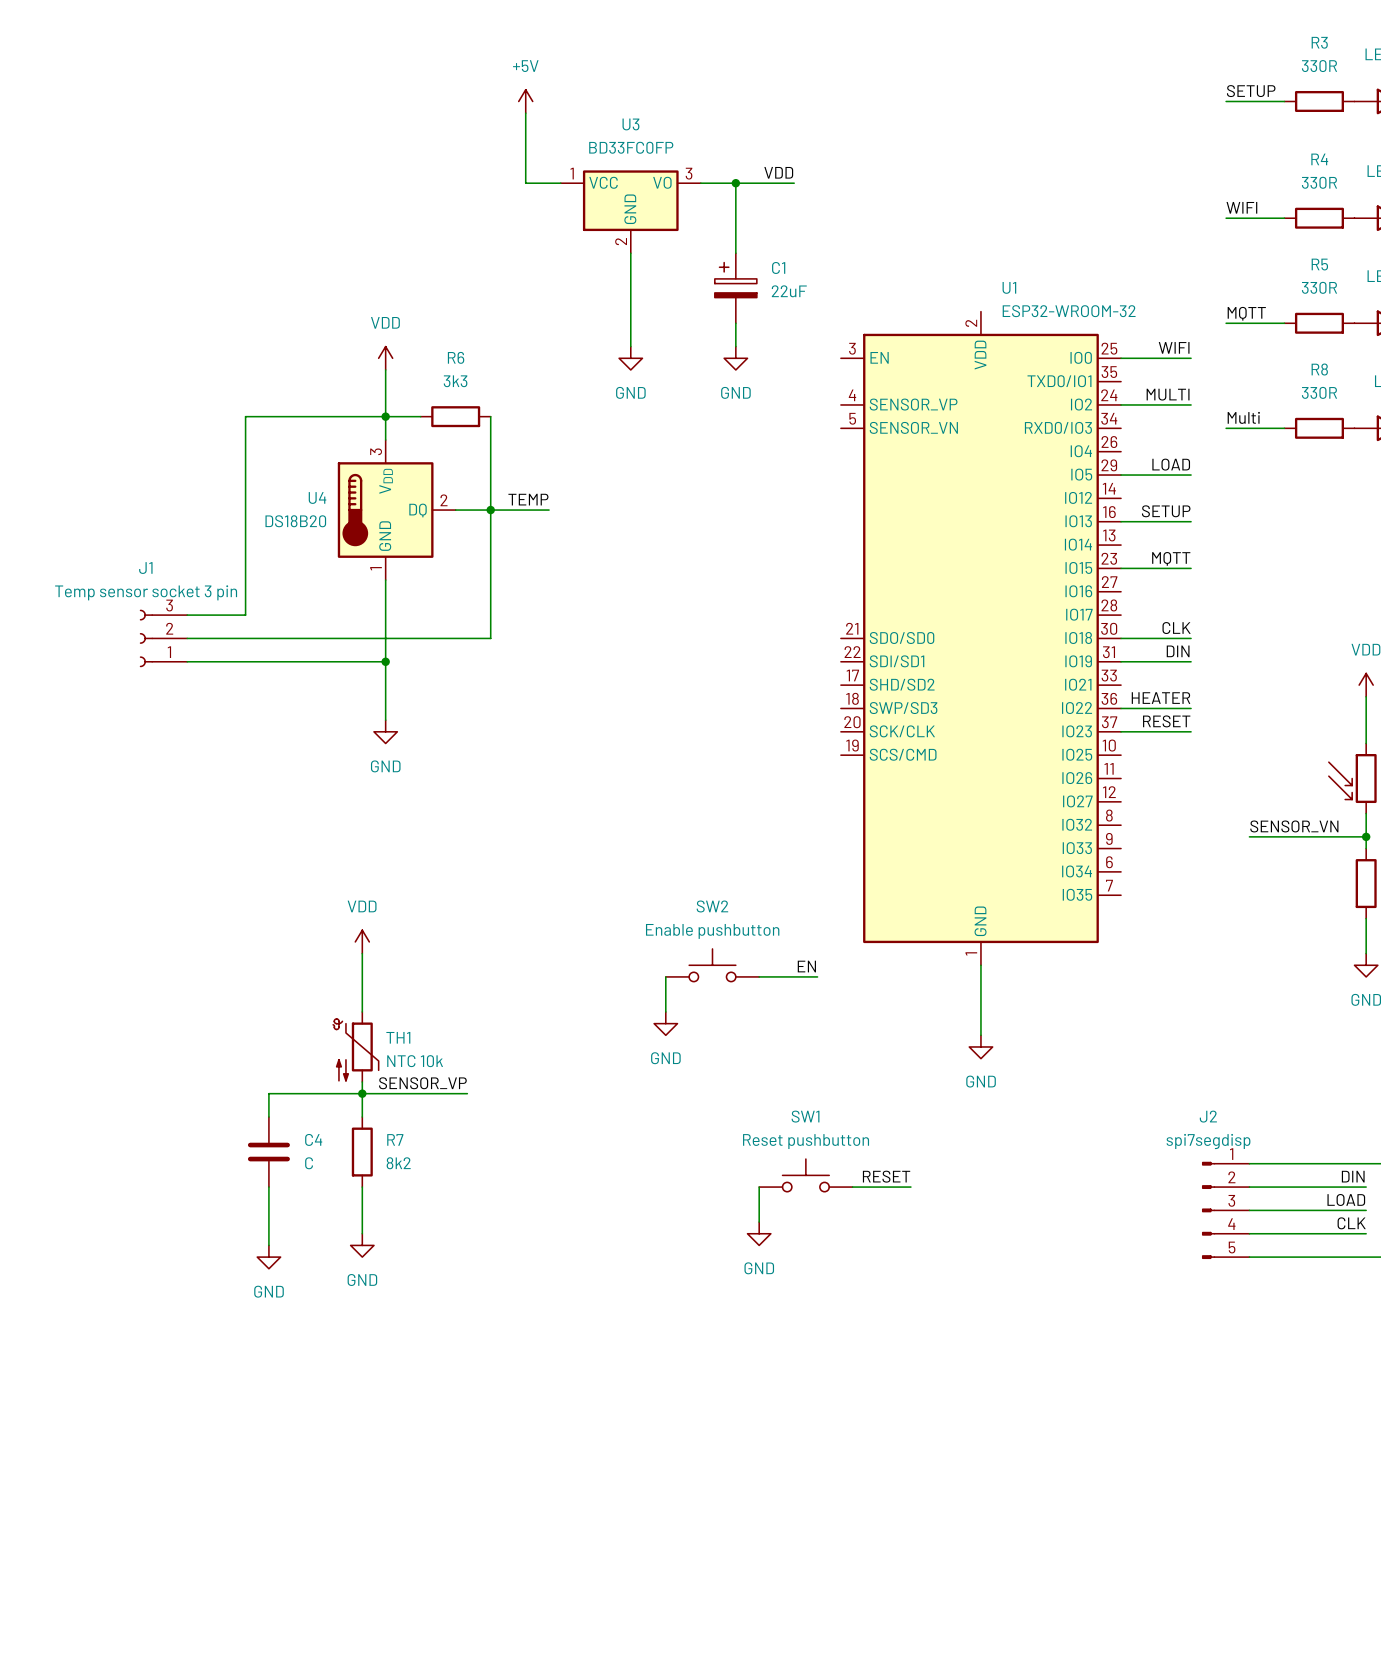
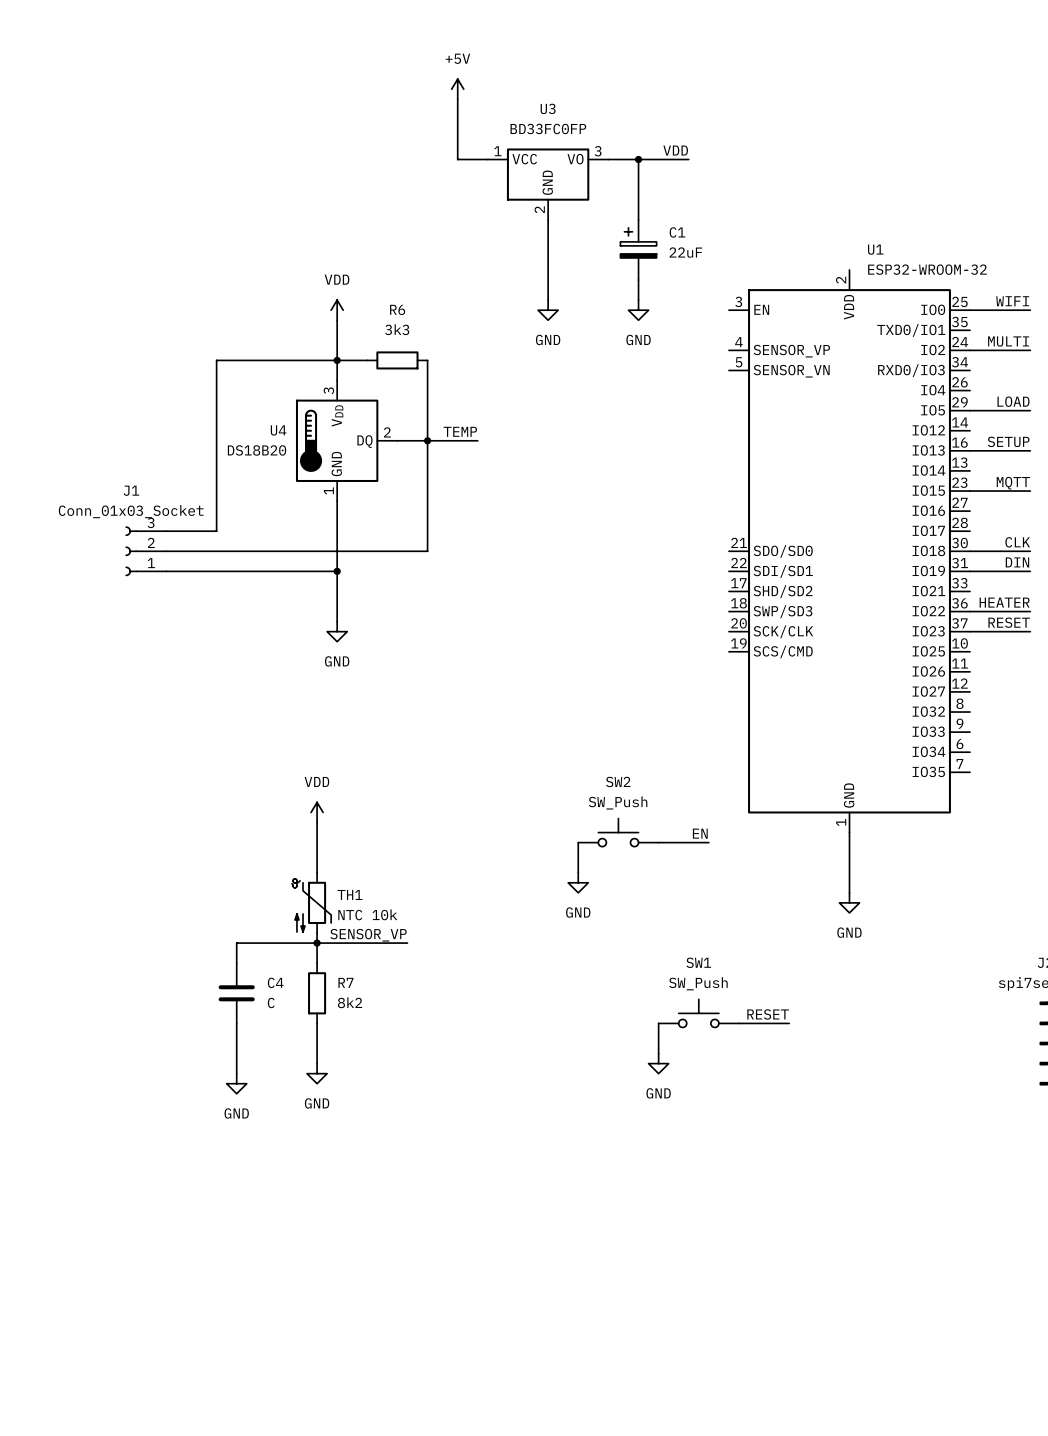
J1 value: Temp sensor socket 3 pin (146, 592) -> Conn_01x03_Socket (131, 511)
SW2 value: Enable pushbutton (712, 931) -> SW_Push (618, 802)
SW1 value: Reset pushbutton (806, 1141) -> SW_Push (698, 983)

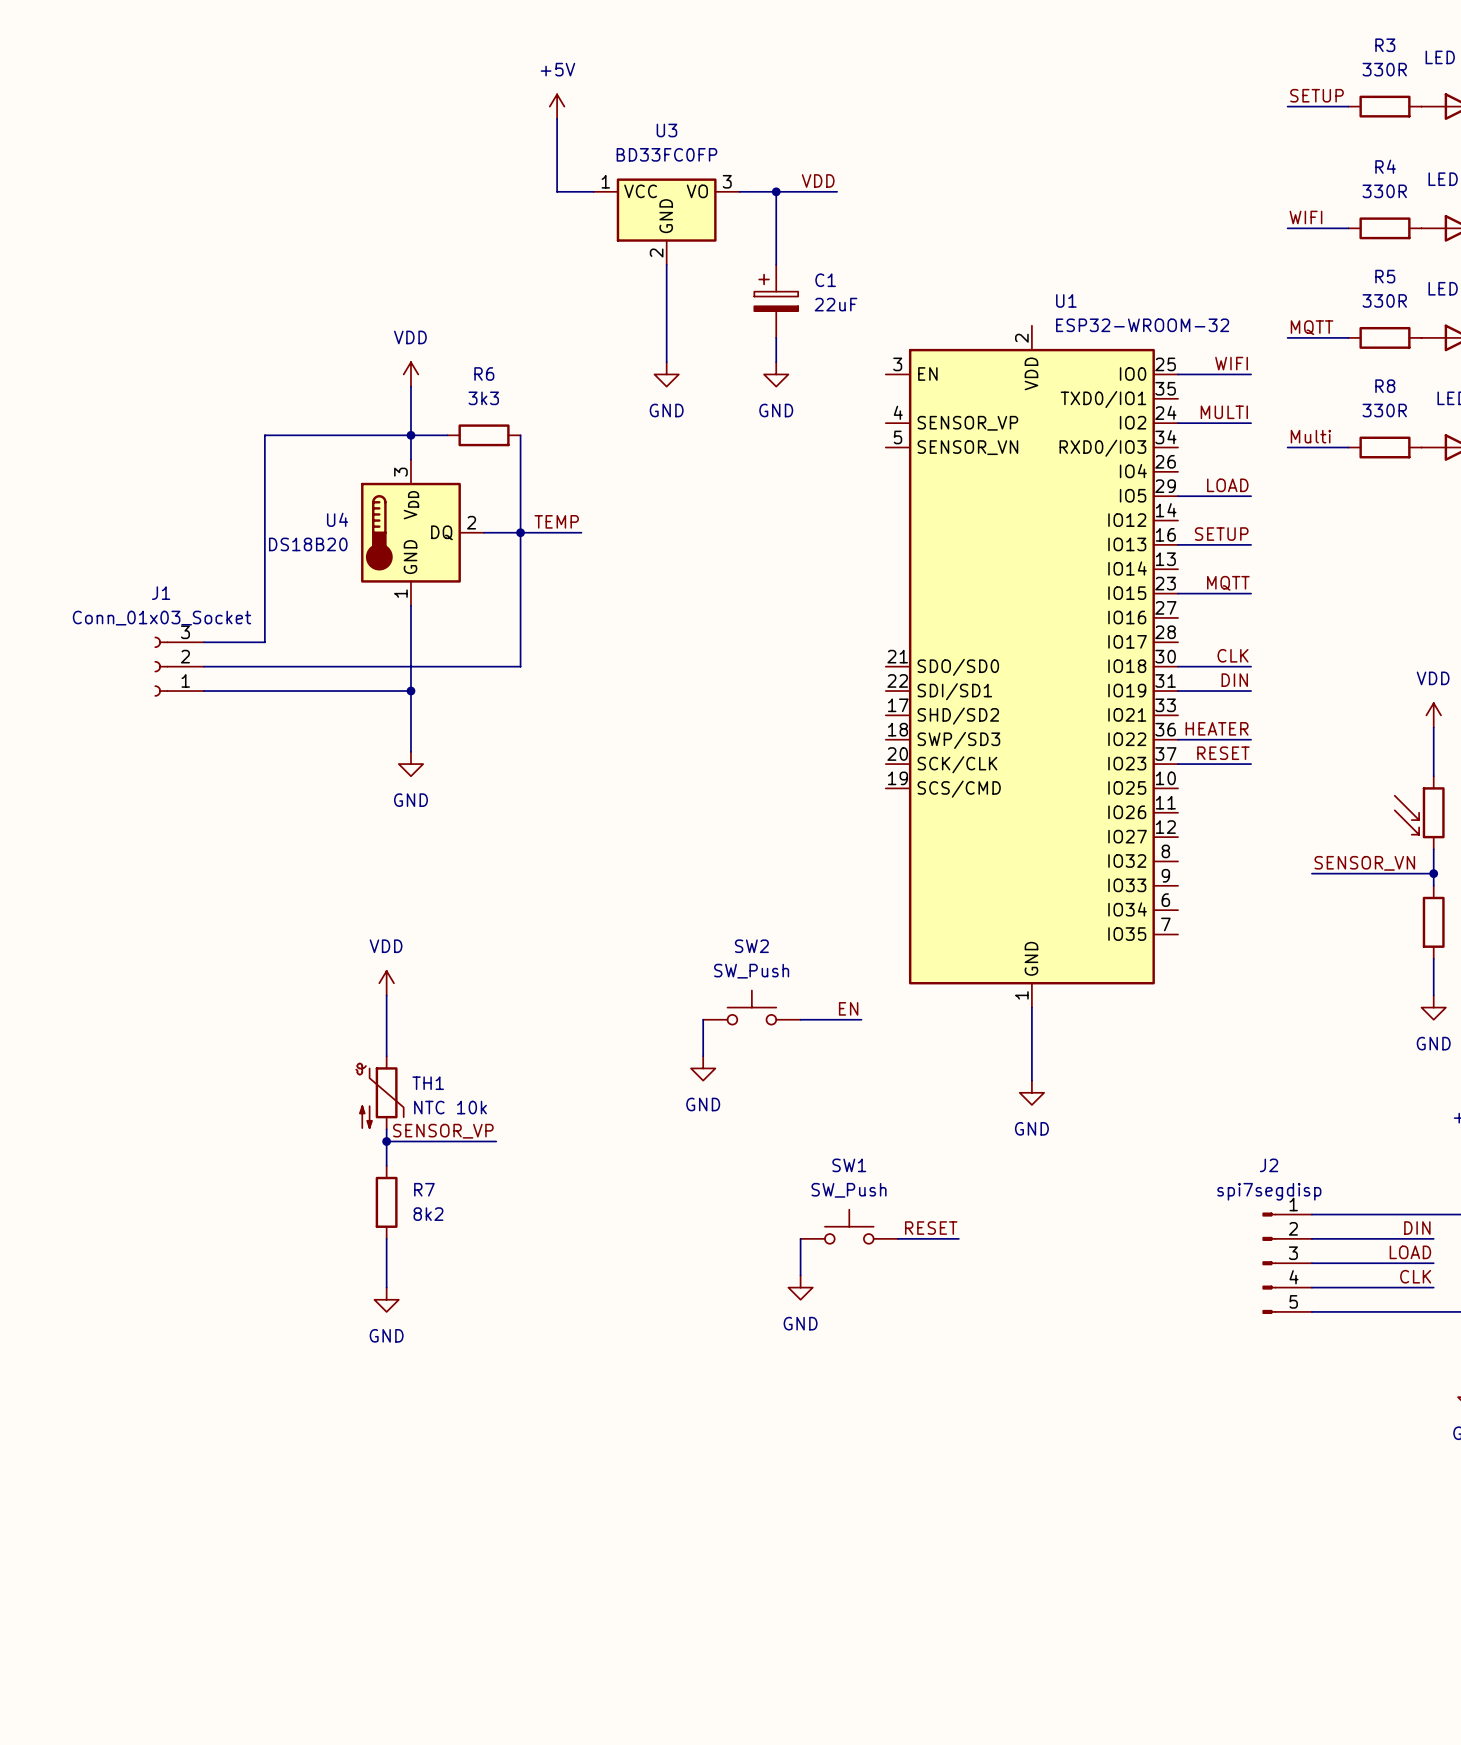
wire: (317, 943) (236, 943) (236, 963) -> none
C4: C (236, 993) -> none
wire: (236, 1023) (236, 1073) -> none
power symbol: GND (236, 1083) -> none

